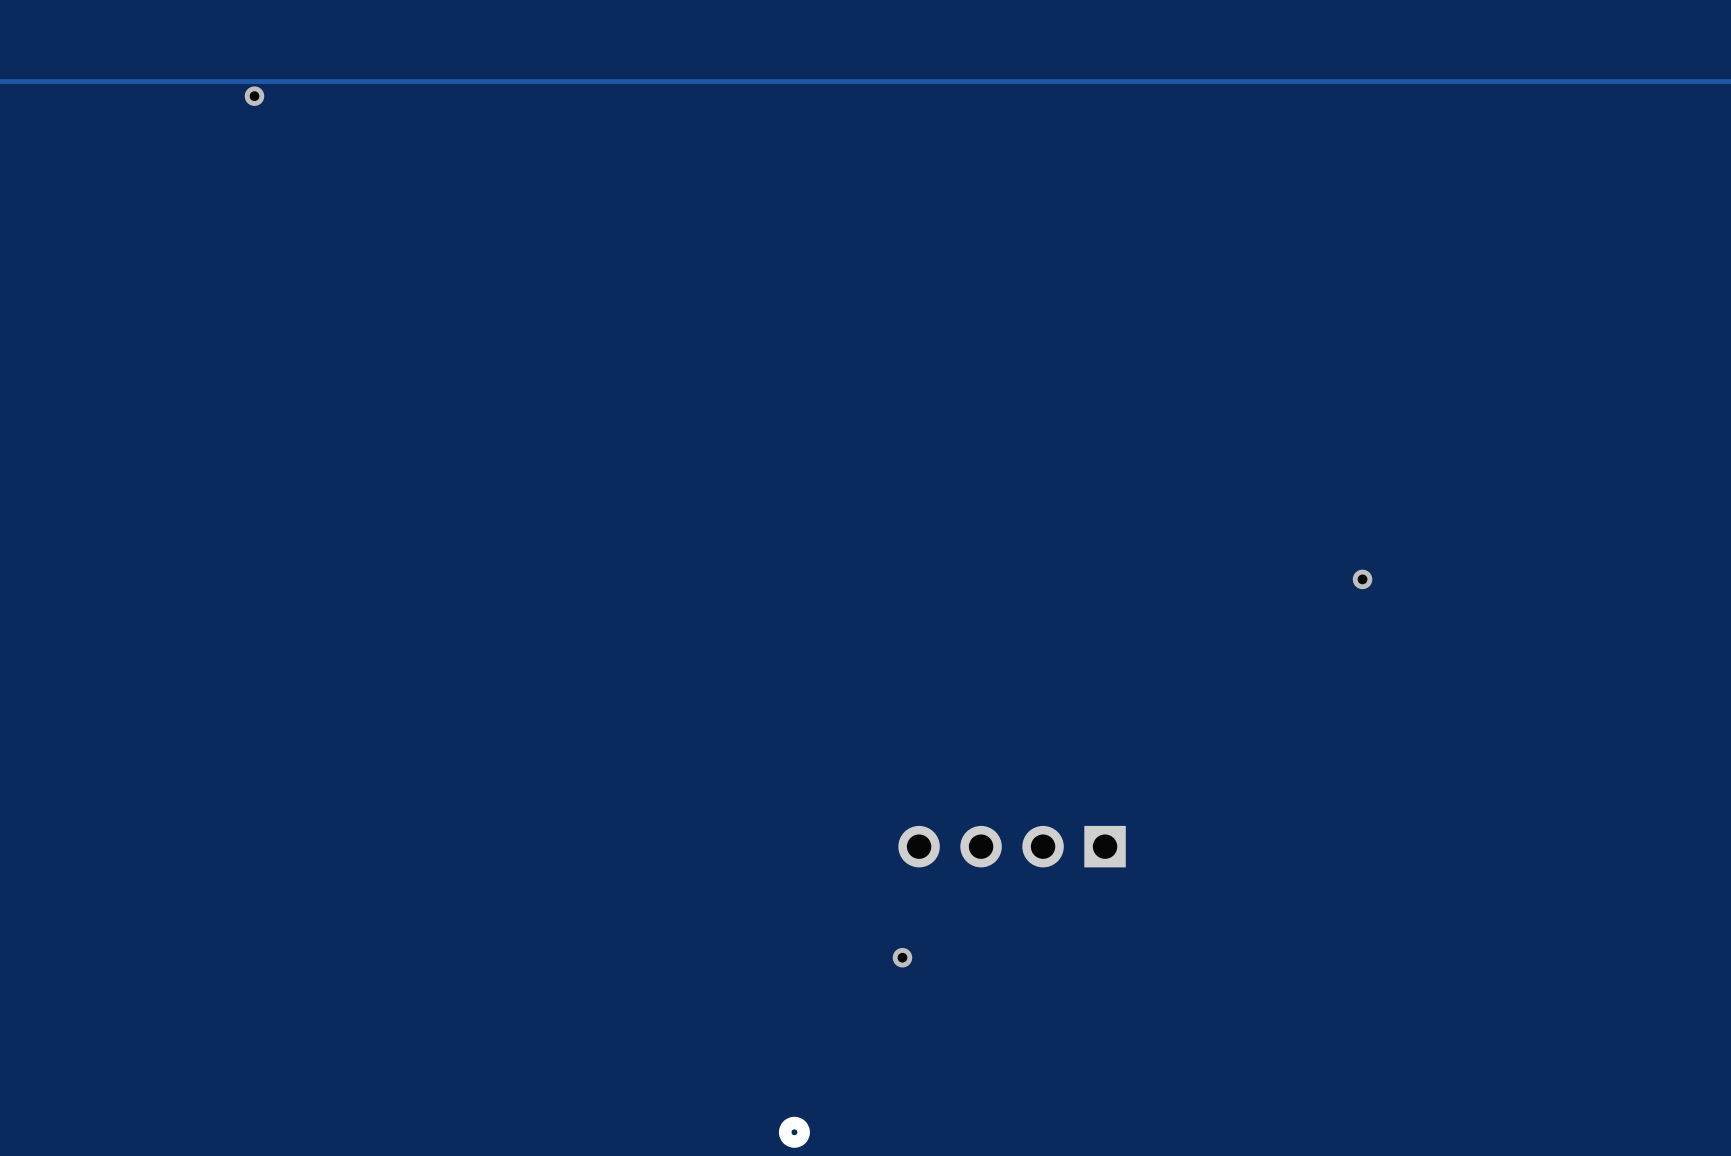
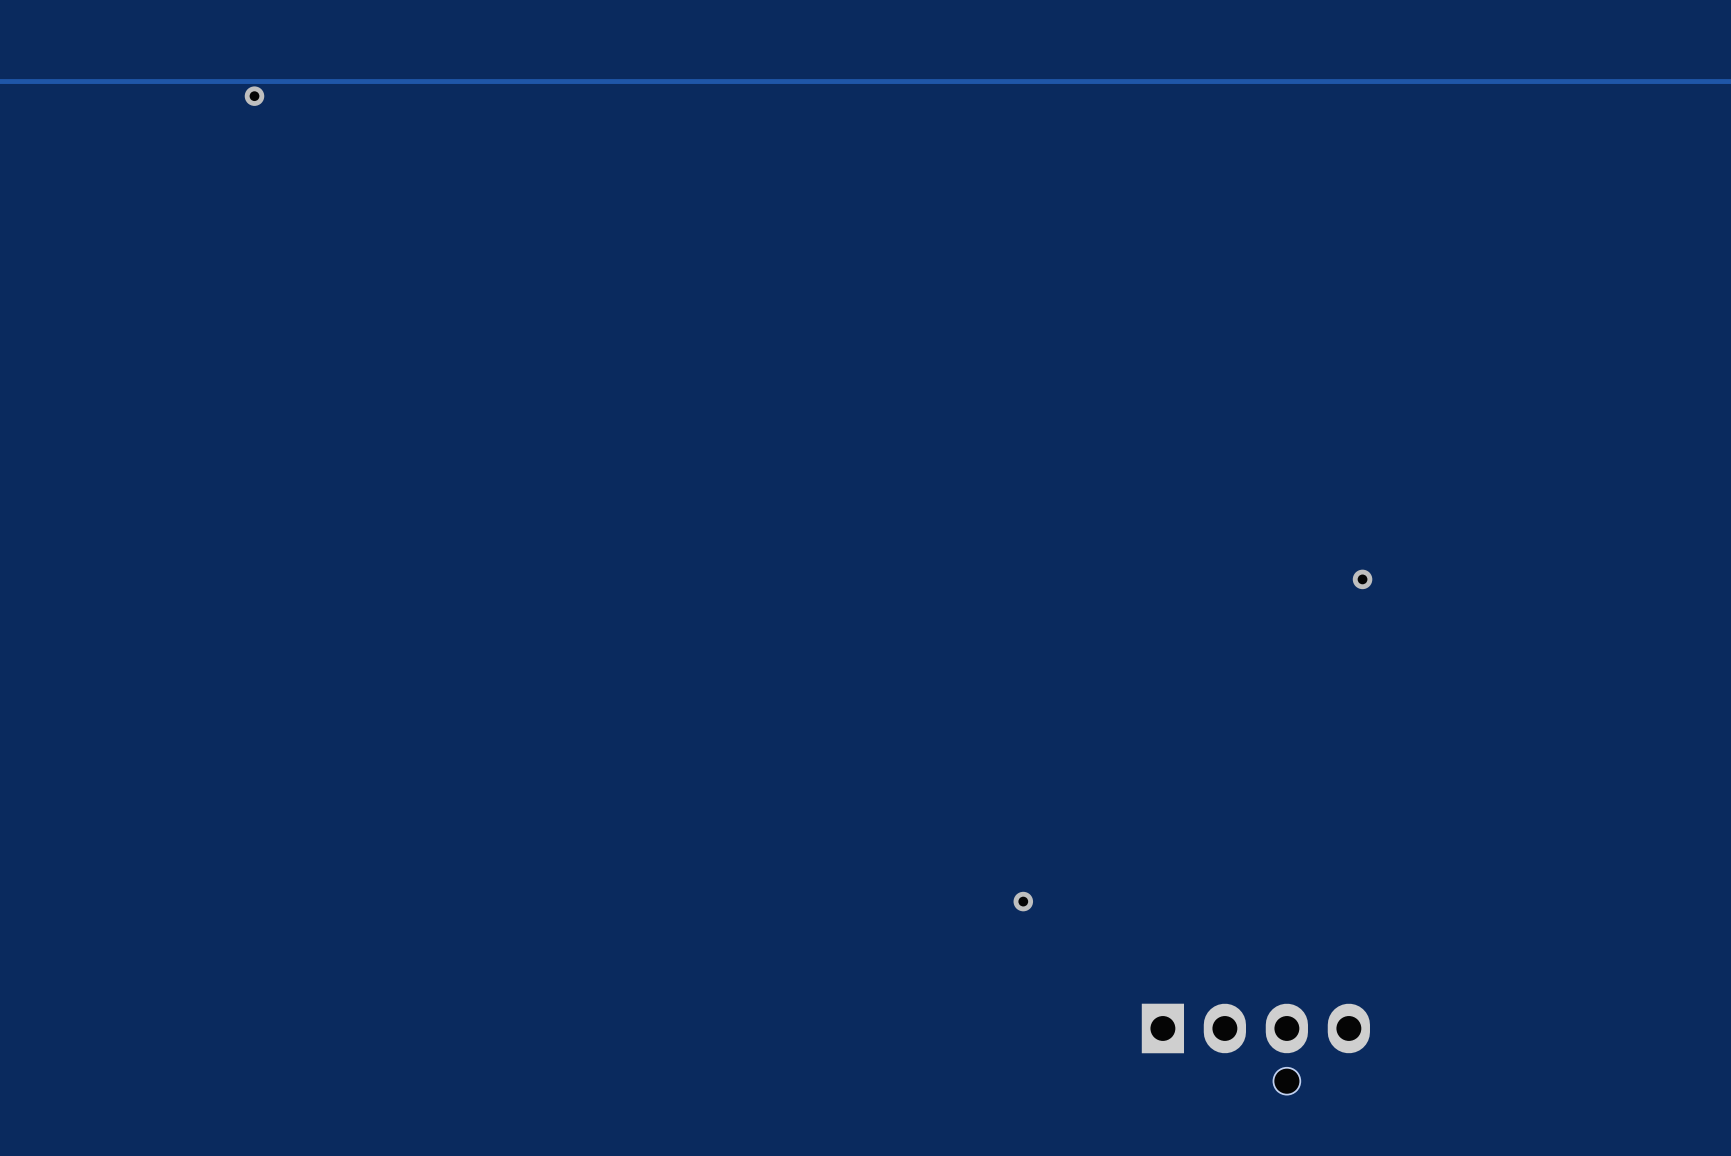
part: (1012, 846) -> none
via position: (902, 957) -> (1023, 901)
part: none -> (1255, 1049)
part: (794, 1132) -> none

